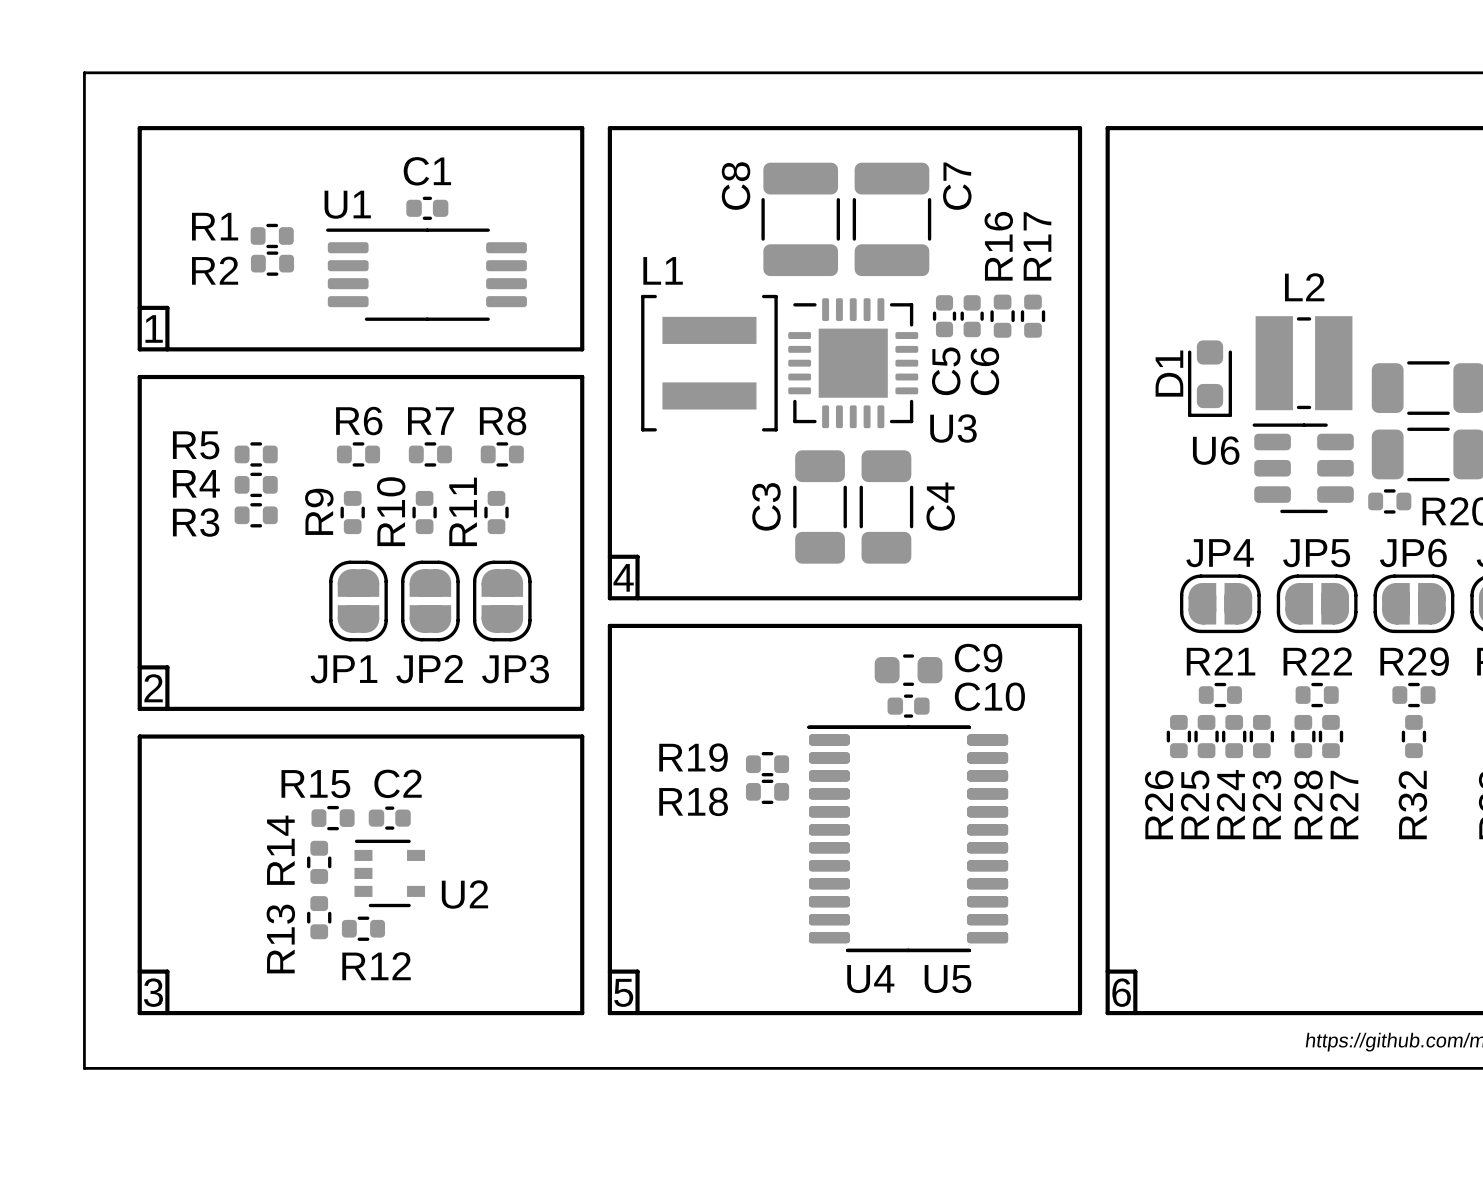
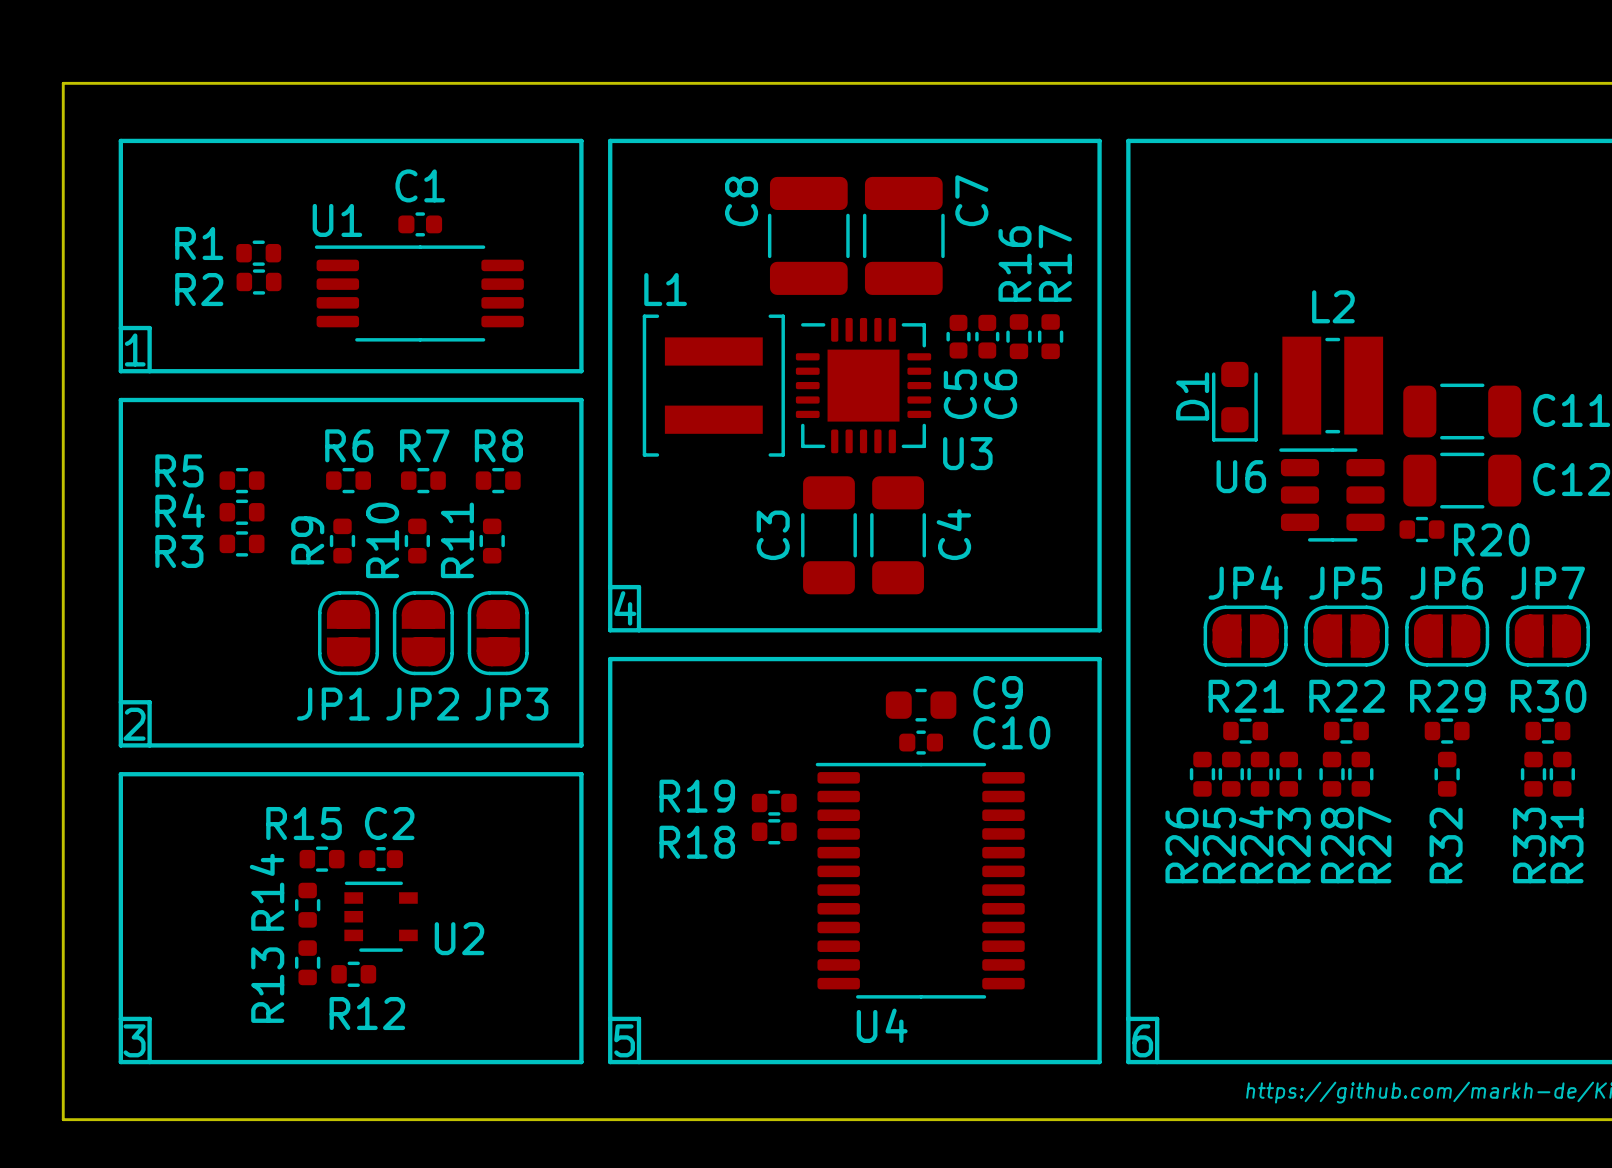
U5: (907, 838) -> none

